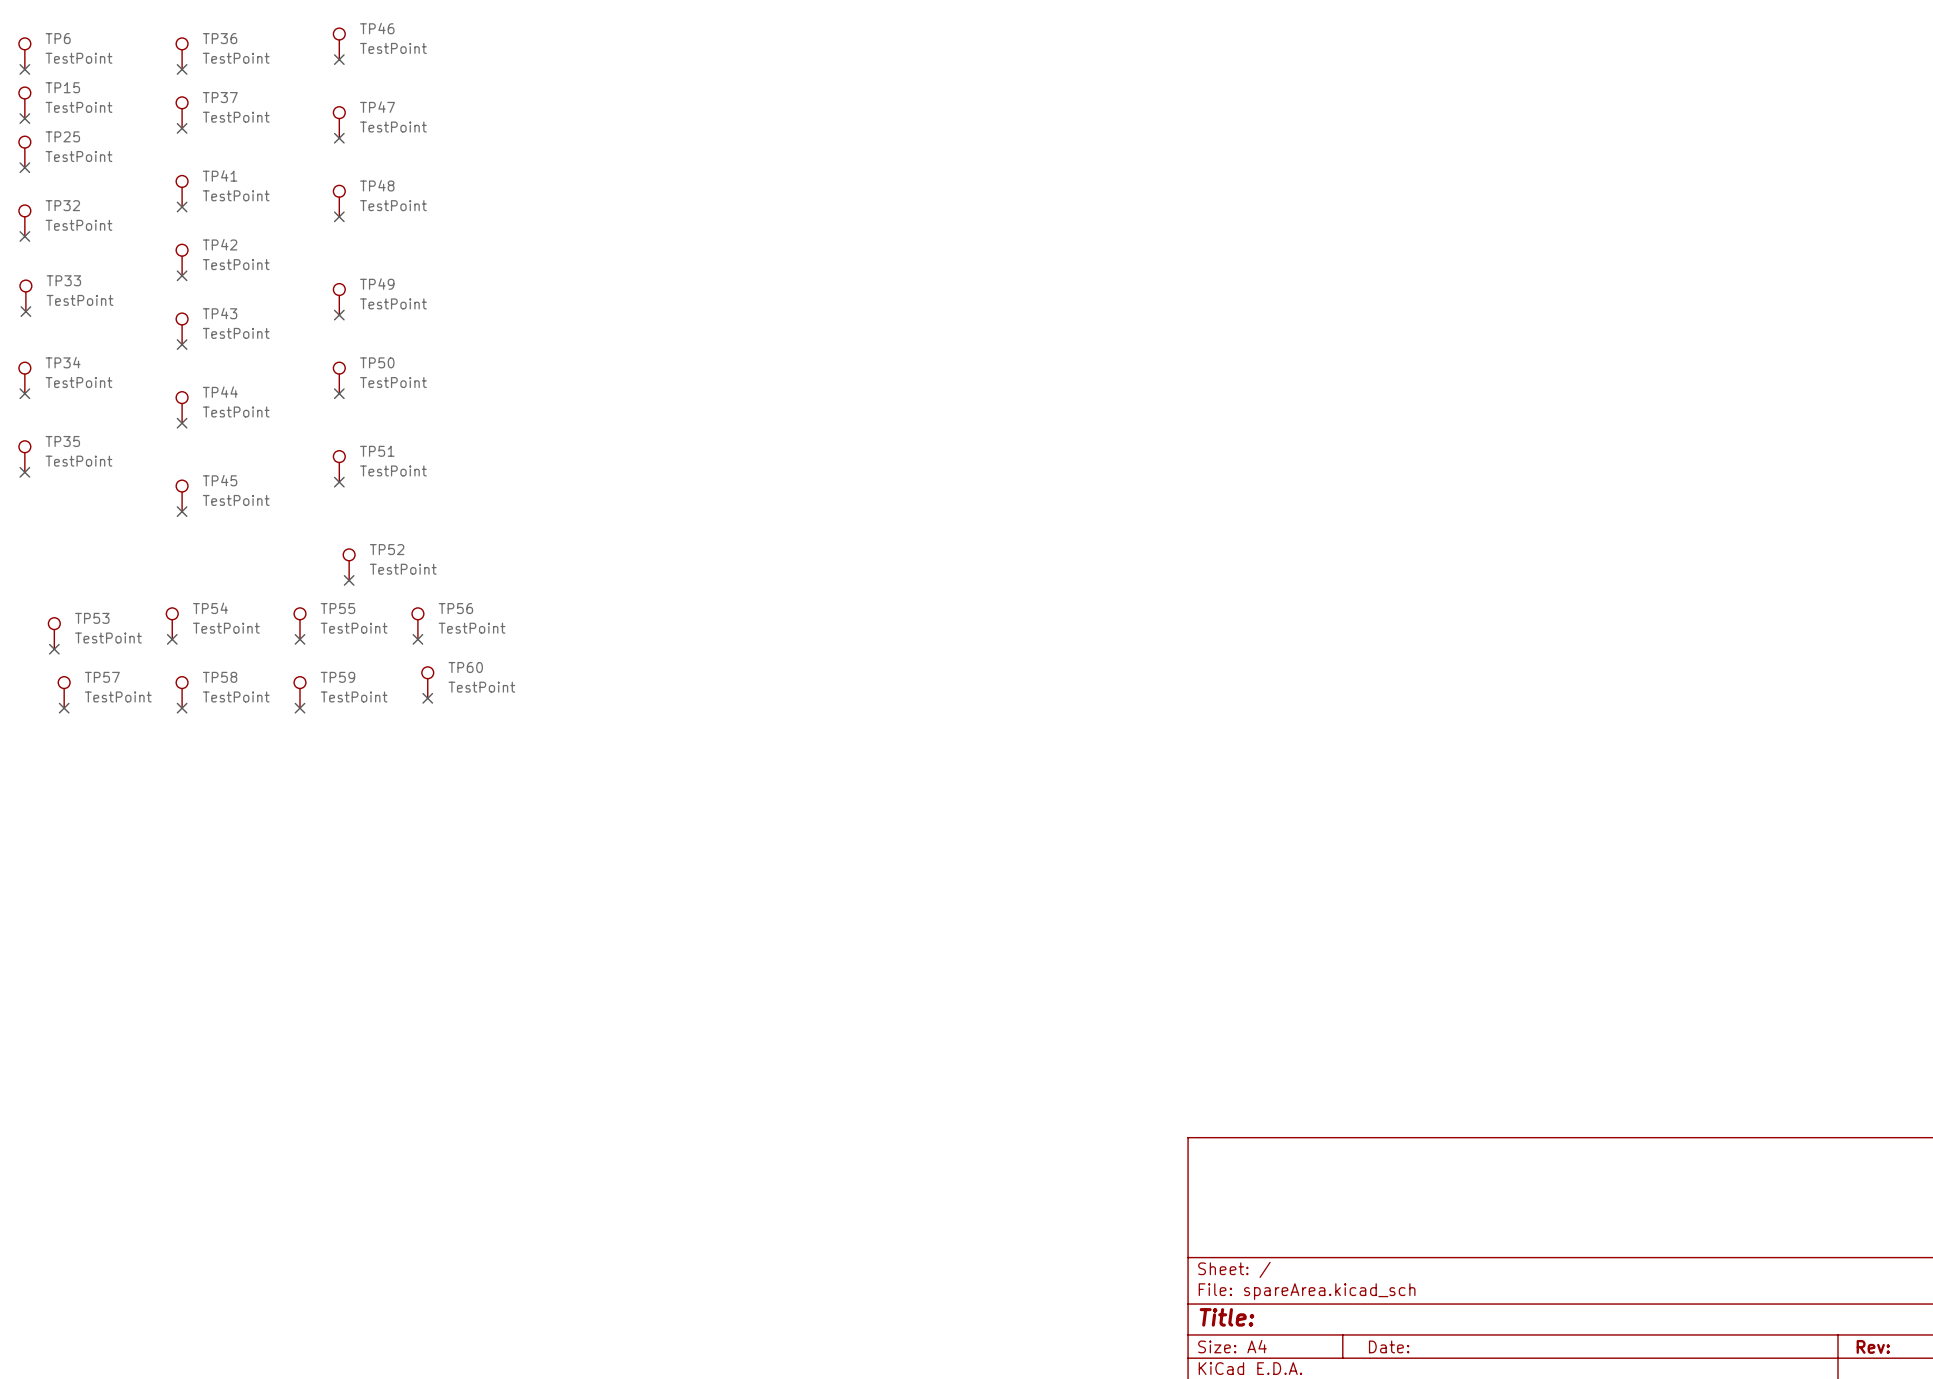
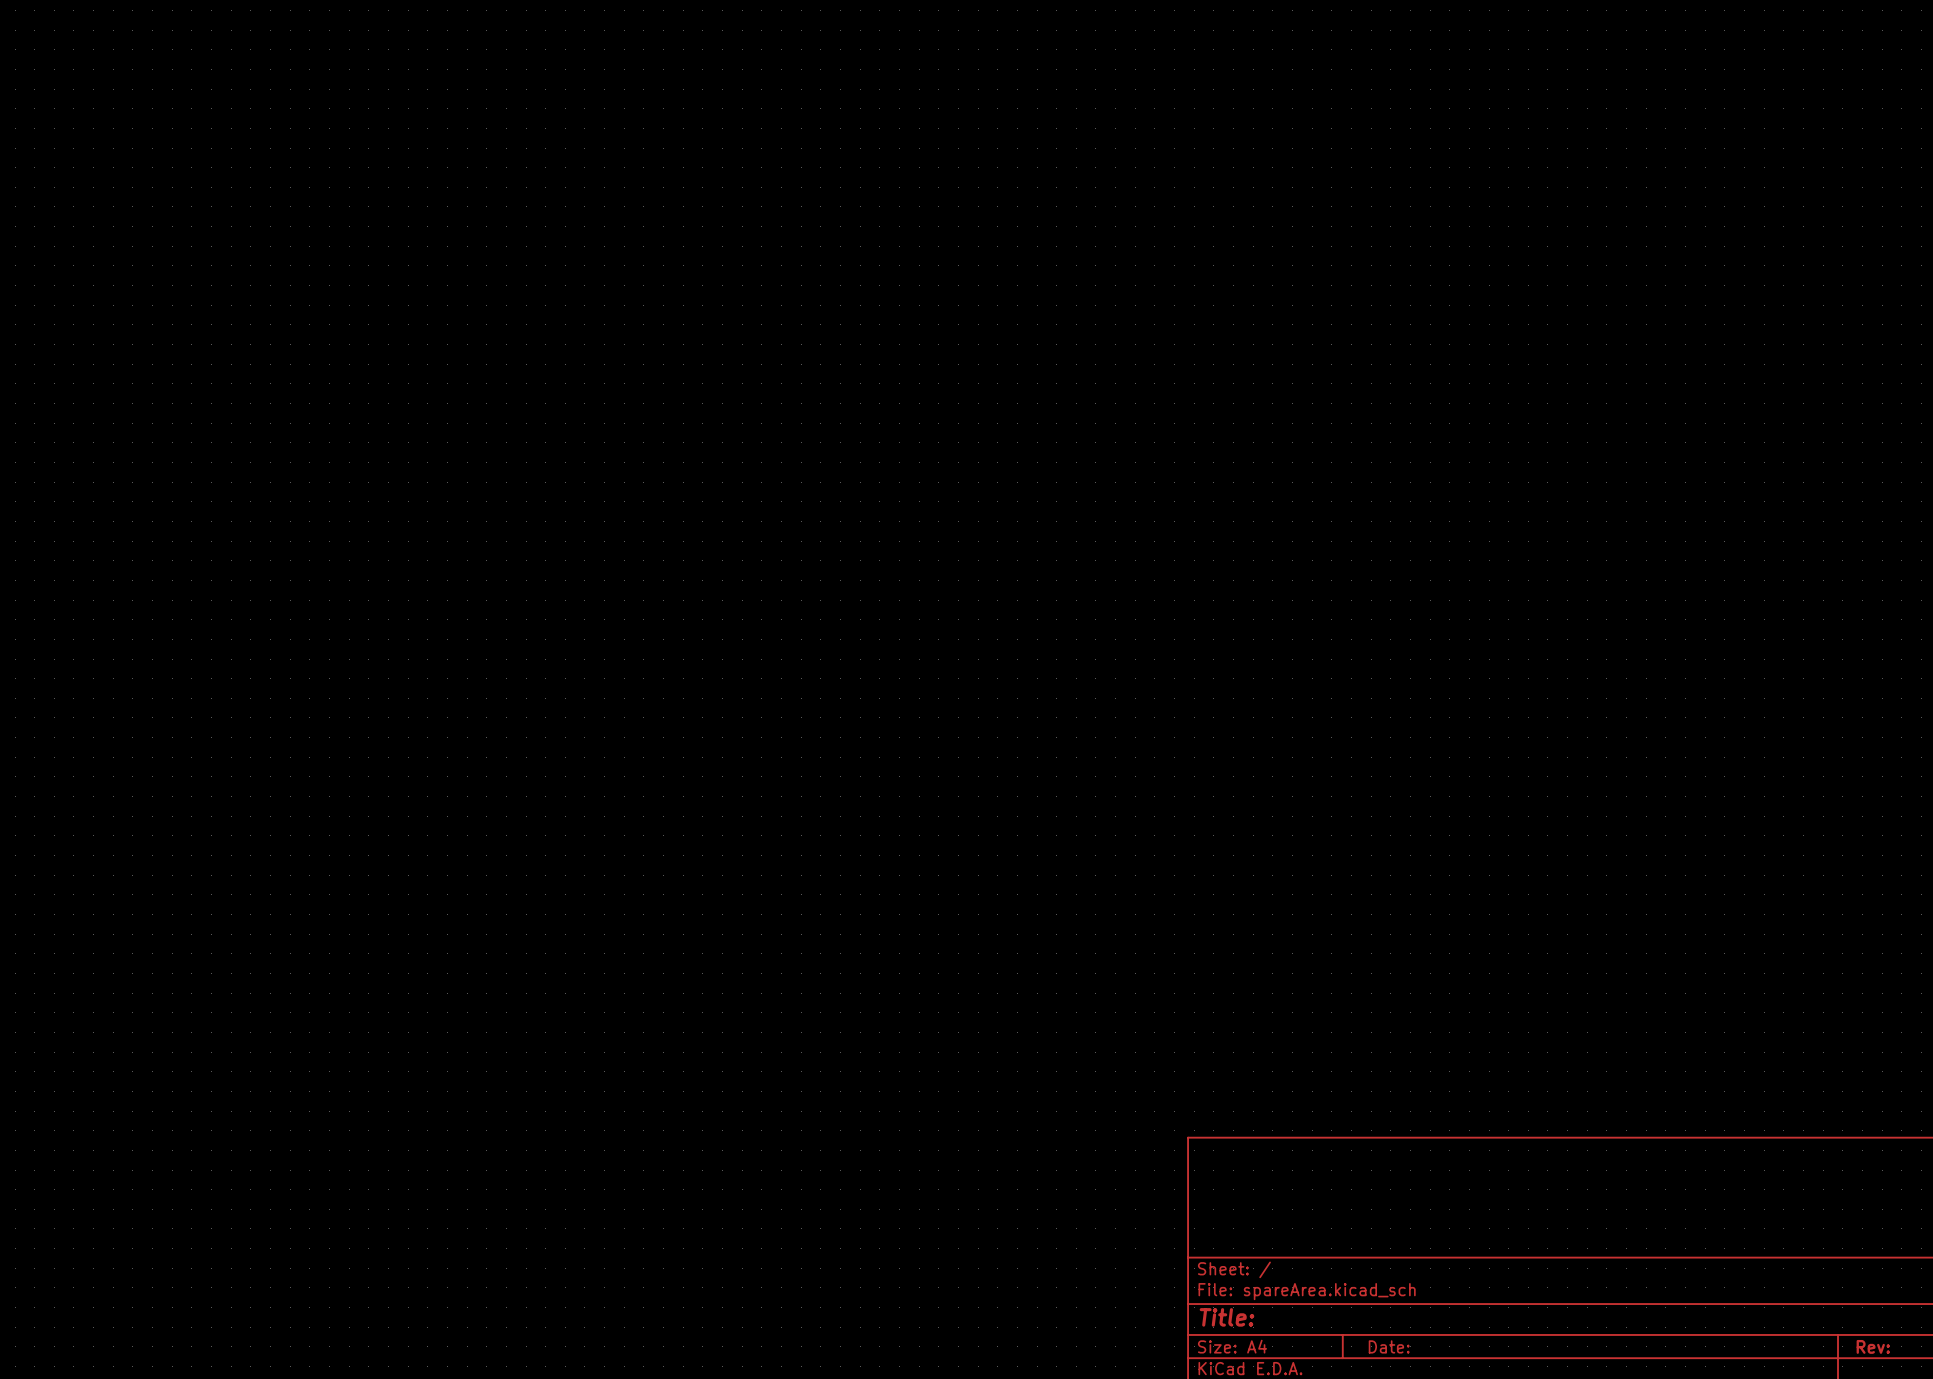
TP46: TestPoint (339, 43) -> none
TP6: TestPoint (24, 53) -> none
TP36: TestPoint (182, 53) -> none
no-connect mark: (339, 59) -> none
no-connect mark: (24, 69) -> none
no-connect mark: (182, 69) -> none
TP15: TestPoint (24, 102) -> none
TP37: TestPoint (182, 112) -> none
no-connect mark: (24, 118) -> none
TP47: TestPoint (339, 122) -> none
no-connect mark: (182, 128) -> none
no-connect mark: (339, 138) -> none
TP25: TestPoint (24, 151) -> none
no-connect mark: (24, 167) -> none
TP41: TestPoint (182, 191) -> none
TP48: TestPoint (339, 201) -> none
no-connect mark: (182, 206) -> none
no-connect mark: (339, 216) -> none
TP32: TestPoint (24, 220) -> none
no-connect mark: (24, 236) -> none
TP42: TestPoint (182, 260) -> none
no-connect mark: (182, 275) -> none
TP33: TestPoint (25, 295) -> none
TP49: TestPoint (339, 299) -> none
no-connect mark: (25, 311) -> none
no-connect mark: (339, 315) -> none
TP43: TestPoint (182, 328) -> none
no-connect mark: (182, 344) -> none
TP34: TestPoint (24, 377) -> none
TP50: TestPoint (339, 377) -> none
no-connect mark: (24, 393) -> none
no-connect mark: (339, 393) -> none
TP44: TestPoint (182, 407) -> none
no-connect mark: (182, 423) -> none
TP35: TestPoint (24, 456) -> none
TP51: TestPoint (339, 466) -> none
no-connect mark: (24, 472) -> none
no-connect mark: (339, 482) -> none
TP45: TestPoint (182, 495) -> none
no-connect mark: (182, 511) -> none
TP52: TestPoint (349, 564) -> none
no-connect mark: (349, 580) -> none
TP54: TestPoint (172, 623) -> none
TP55: TestPoint (300, 623) -> none
TP56: TestPoint (417, 623) -> none
TP53: TestPoint (54, 633) -> none
no-connect mark: (172, 639) -> none
no-connect mark: (300, 639) -> none
no-connect mark: (417, 639) -> none
no-connect mark: (54, 649) -> none
TP60: TestPoint (427, 682) -> none
TP57: TestPoint (64, 692) -> none
TP58: TestPoint (182, 692) -> none
TP59: TestPoint (300, 692) -> none
no-connect mark: (427, 698) -> none
no-connect mark: (64, 708) -> none
no-connect mark: (182, 708) -> none
no-connect mark: (300, 708) -> none

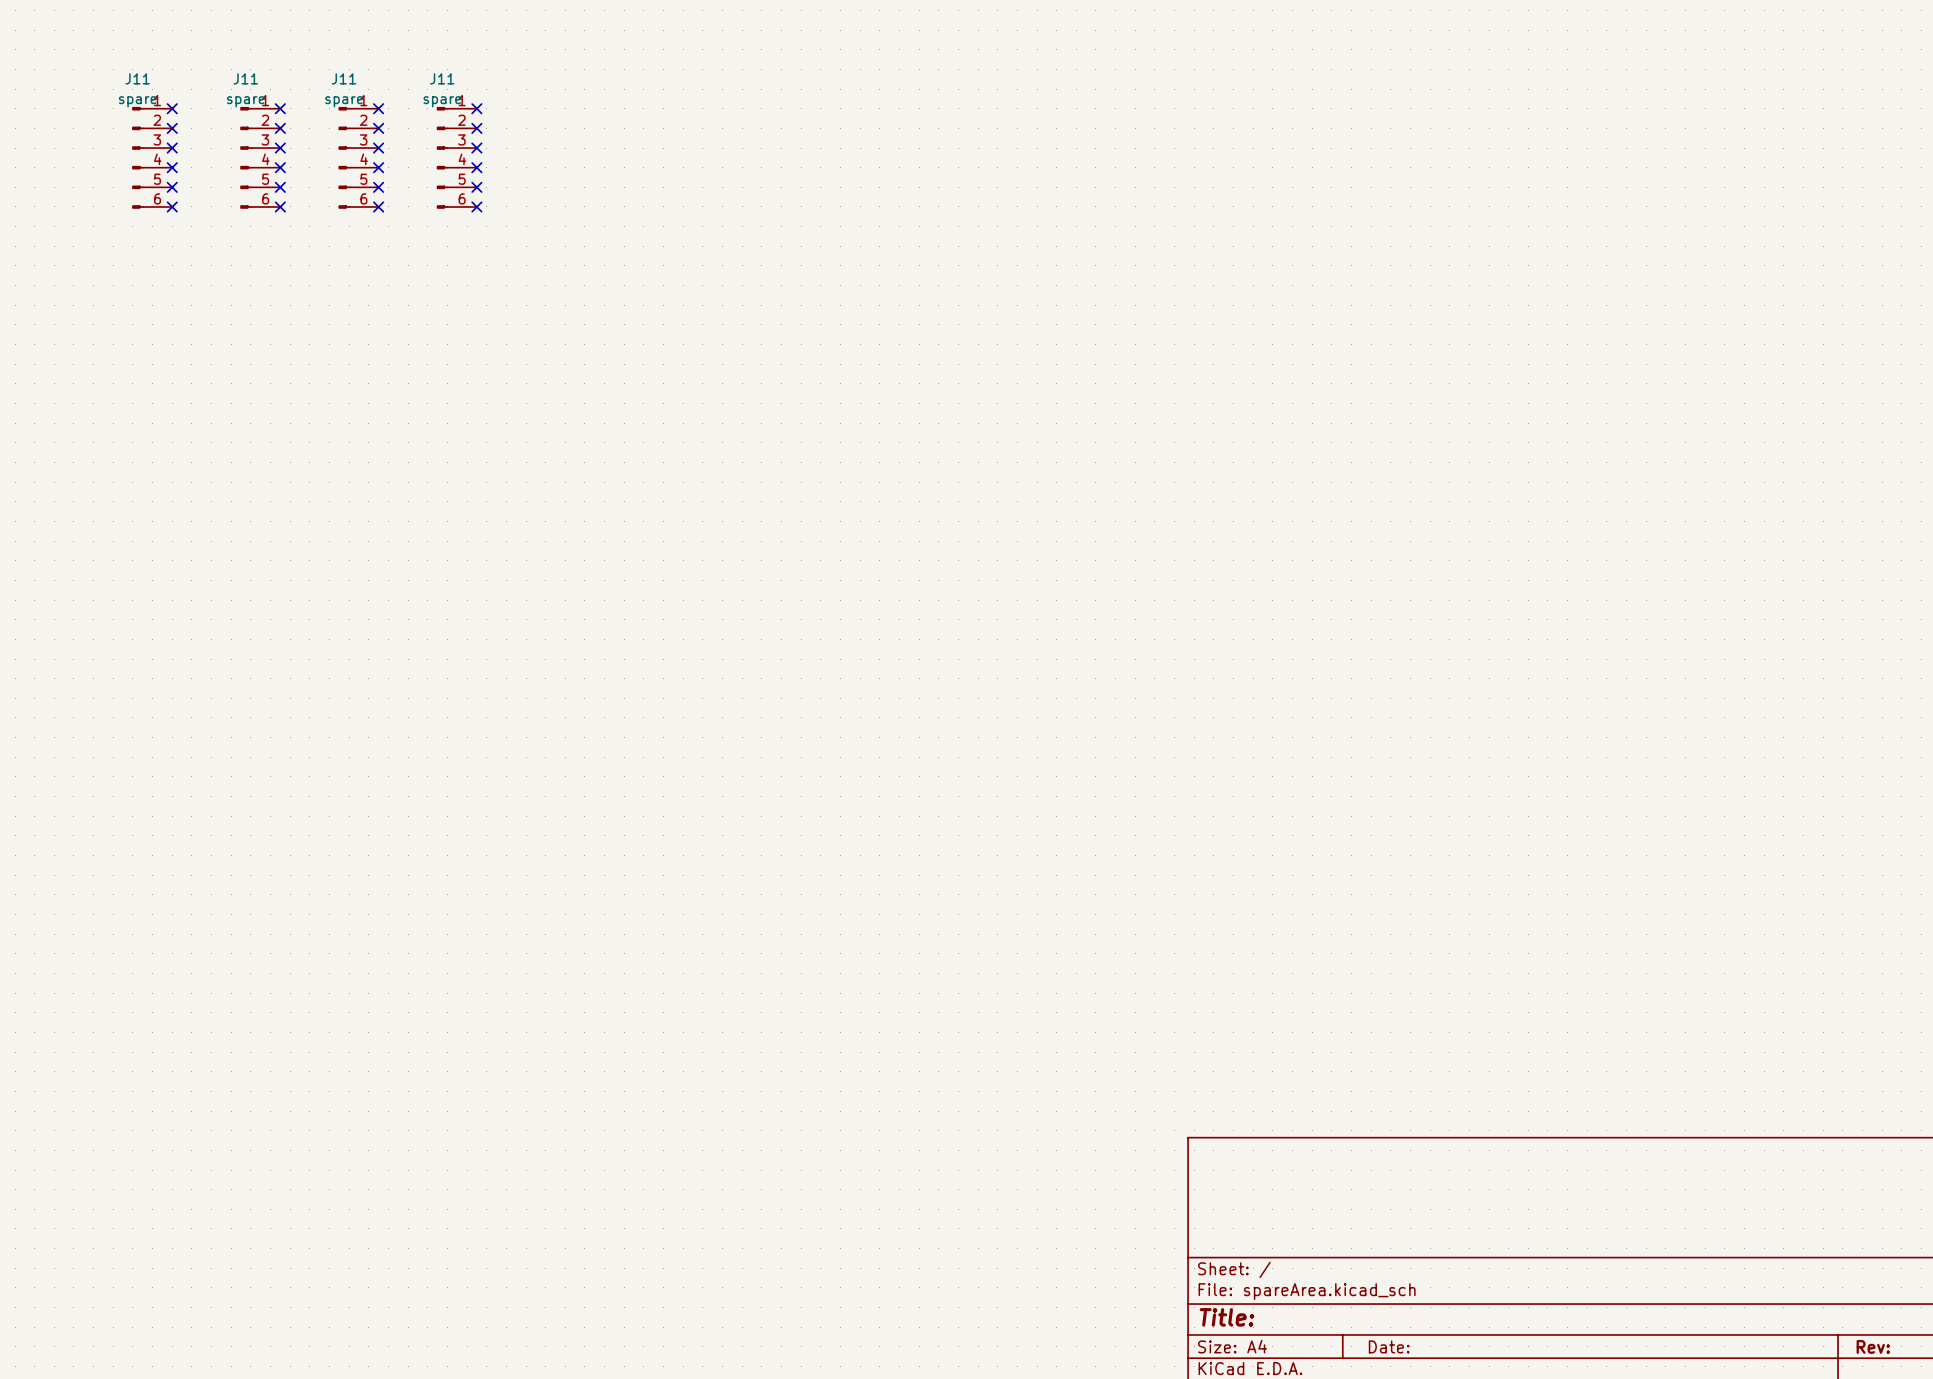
no-connect mark: none -> (172, 108)
no-connect mark: none -> (280, 108)
no-connect mark: none -> (378, 108)
no-connect mark: none -> (476, 108)
no-connect mark: none -> (172, 128)
no-connect mark: none -> (280, 128)
no-connect mark: none -> (378, 128)
no-connect mark: none -> (476, 128)
no-connect mark: none -> (172, 148)
no-connect mark: none -> (280, 148)
no-connect mark: none -> (378, 148)
no-connect mark: none -> (476, 148)
J11: none -> spare (152, 157)
J11: none -> spare (260, 157)
J11: none -> spare (358, 157)
J11: none -> spare (456, 157)
no-connect mark: none -> (172, 167)
no-connect mark: none -> (280, 167)
no-connect mark: none -> (378, 167)
no-connect mark: none -> (476, 167)
no-connect mark: none -> (172, 187)
no-connect mark: none -> (280, 187)
no-connect mark: none -> (378, 187)
no-connect mark: none -> (476, 187)
no-connect mark: none -> (172, 206)
no-connect mark: none -> (280, 206)
no-connect mark: none -> (378, 206)
no-connect mark: none -> (476, 206)

